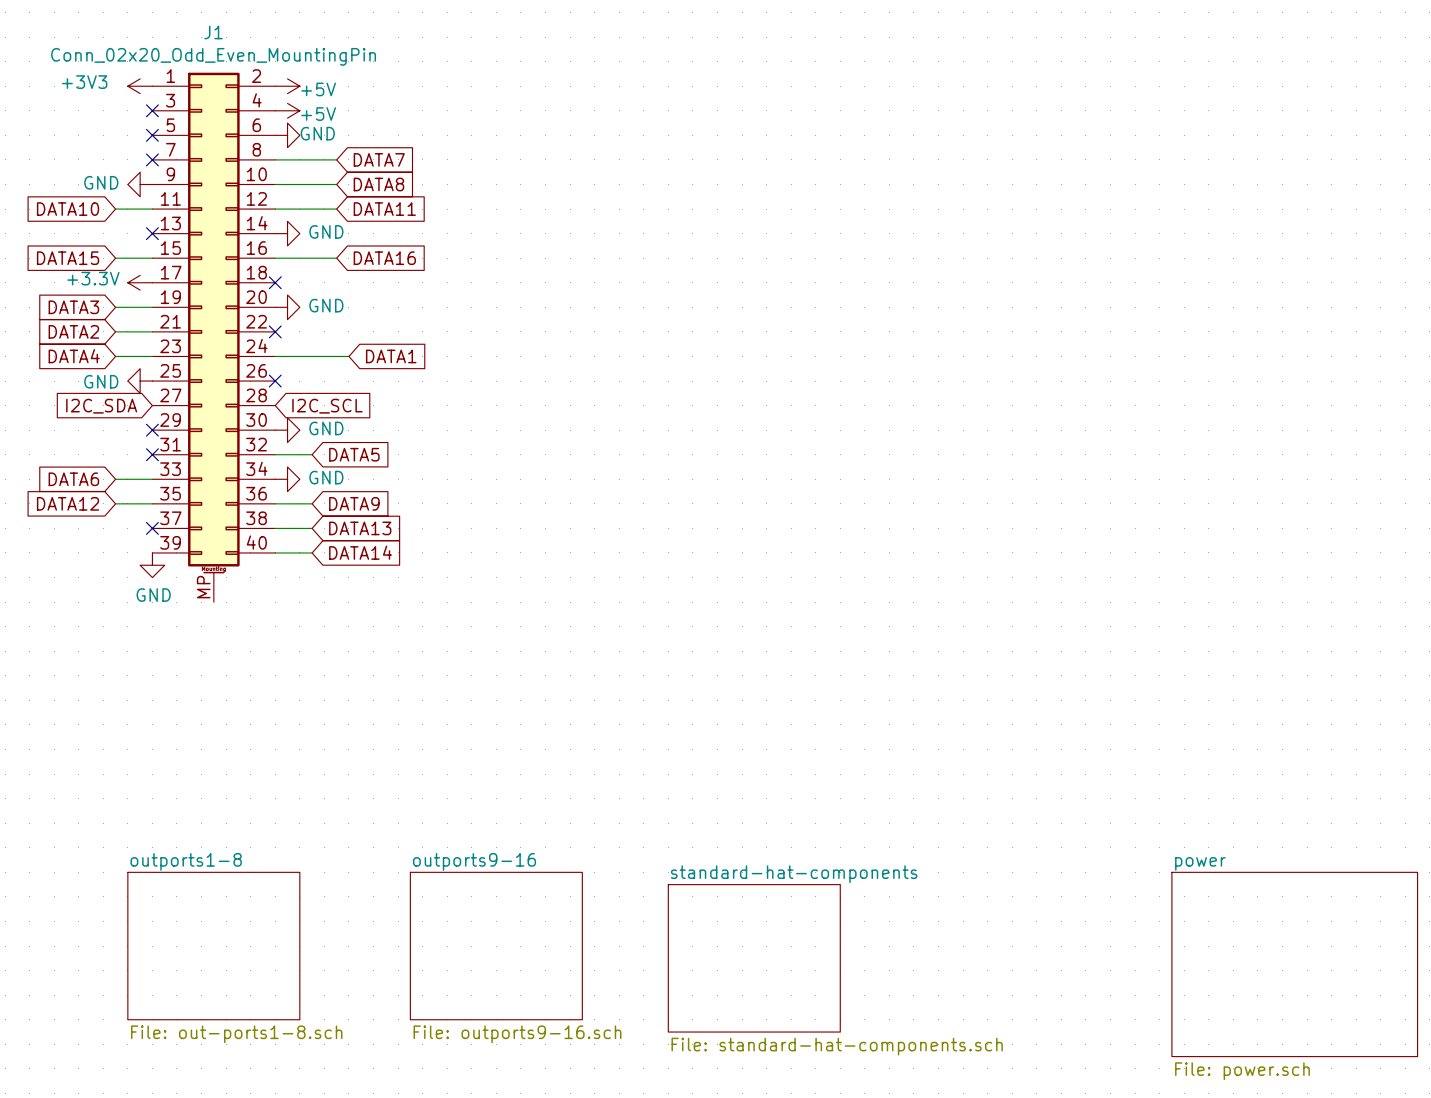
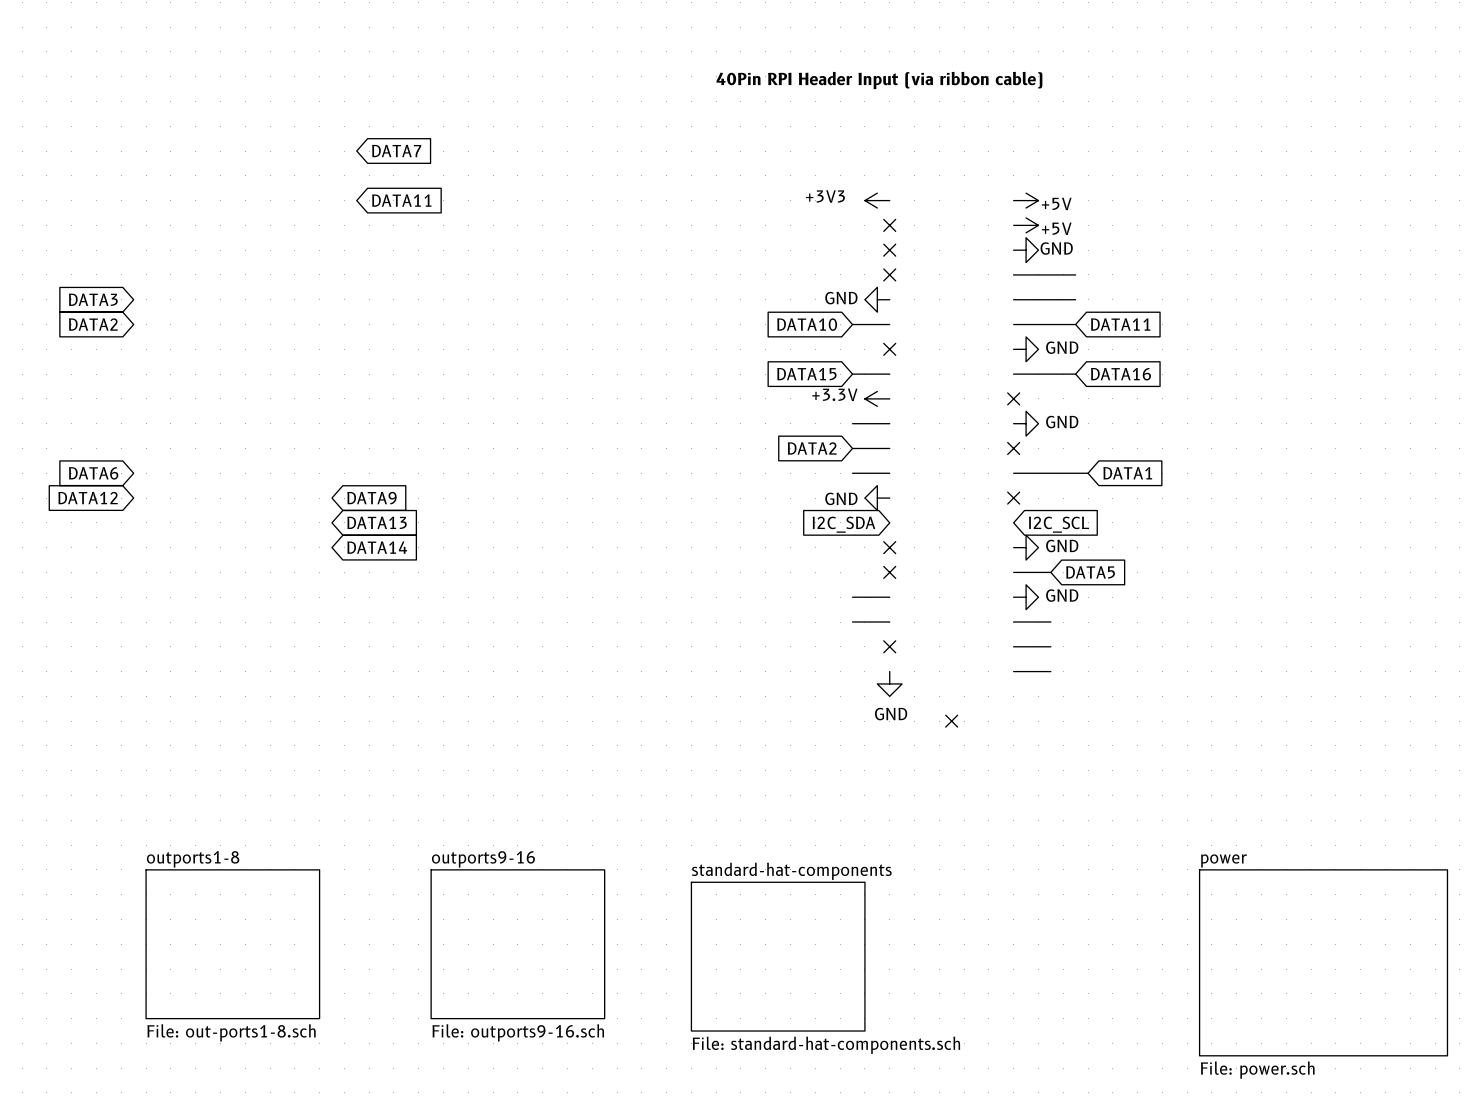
power symbol: +3V3 (140, 86) -> none
power symbol: +5V (287, 86) -> none
text: none -> 40Pin RPI Header Input (via ribbon cable) (879, 80)
no-connect mark: (152, 110) -> none
power symbol: +5V (287, 110) -> none
no-connect mark: (152, 135) -> none
power symbol: GND (287, 135) -> none
no-connect mark: (152, 159) -> none
wire: (275, 159) (336, 159) -> none
power symbol: GND (140, 184) -> none
wire: (275, 184) (336, 184) -> none
global label: DATA8 (378, 184) -> none
global label: DATA10 (68, 209) -> none
wire: (115, 209) (152, 209) -> none
wire: (275, 209) (336, 209) -> none
power symbol: none -> +3V3 (877, 200)
power symbol: none -> +5V (1026, 200)
no-connect mark: (152, 233) -> none
power symbol: GND (287, 233) -> none
no-connect mark: none -> (889, 225)
power symbol: none -> +5V (1026, 225)
global label: DATA15 (68, 258) -> none
wire: (115, 258) (152, 258) -> none
wire: (275, 258) (336, 258) -> none
global label: DATA16 (384, 258) -> none
no-connect mark: none -> (889, 250)
power symbol: none -> GND (1026, 250)
power symbol: +3.3V (140, 282) -> none
no-connect mark: (275, 282) -> none
no-connect mark: none -> (889, 274)
wire: none -> (1013, 274) (1075, 274)
wire: (115, 307) (152, 307) -> none
power symbol: GND (287, 307) -> none
power symbol: none -> GND (877, 299)
wire: none -> (1013, 299) (1075, 299)
wire: (115, 331) (152, 331) -> none
no-connect mark: (275, 331) -> none
global label: none -> DATA10 (807, 324)
wire: none -> (852, 324) (889, 324)
wire: none -> (1013, 324) (1075, 324)
global label: none -> DATA11 (1120, 324)
J1: Conn_02x20_Odd_Even_MountingPin (213, 337) -> none
global label: DATA4 (74, 356) -> none
wire: (115, 356) (152, 356) -> none
wire: (275, 356) (348, 356) -> none
global label: DATA1 (391, 356) -> none
no-connect mark: none -> (889, 349)
power symbol: none -> GND (1026, 349)
power symbol: GND (140, 381) -> none
no-connect mark: (275, 381) -> none
global label: none -> DATA15 (806, 374)
wire: none -> (852, 374) (889, 374)
wire: none -> (1013, 374) (1075, 374)
global label: none -> DATA16 (1120, 374)
power symbol: none -> +3.3V (877, 398)
no-connect mark: none -> (1013, 398)
global label: I2C_SDA (101, 406) -> none
global label: I2C_SCL (327, 406) -> none
no-connect mark: (152, 430) -> none
power symbol: GND (287, 430) -> none
wire: none -> (852, 423) (889, 423)
power symbol: none -> GND (1026, 423)
no-connect mark: (152, 454) -> none
wire: (275, 454) (312, 454) -> none
global label: DATA5 (354, 454) -> none
global label: none -> DATA2 (812, 448)
wire: none -> (852, 448) (889, 448)
no-connect mark: none -> (1013, 448)
wire: (115, 479) (152, 479) -> none
power symbol: GND (287, 479) -> none
wire: none -> (852, 473) (889, 473)
wire: none -> (1013, 473) (1088, 473)
global label: none -> DATA1 (1127, 473)
wire: (115, 503) (152, 503) -> none
wire: (275, 503) (312, 503) -> none
power symbol: none -> GND (877, 498)
no-connect mark: none -> (1013, 498)
no-connect mark: (152, 528) -> none
wire: (275, 528) (312, 528) -> none
global label: none -> I2C_SDA (843, 524)
global label: none -> I2C_SCL (1059, 524)
wire: (275, 552) (312, 552) -> none
no-connect mark: none -> (889, 547)
power symbol: none -> GND (1026, 547)
power symbol: GND (152, 565) -> none
no-connect mark: none -> (889, 572)
wire: none -> (1013, 572) (1050, 572)
global label: none -> DATA5 (1090, 572)
wire: none -> (852, 597) (889, 597)
power symbol: none -> GND (1026, 597)
wire: none -> (852, 622) (889, 622)
wire: none -> (1013, 622) (1050, 622)
no-connect mark: none -> (889, 646)
wire: none -> (1013, 646) (1050, 646)
wire: none -> (1013, 671) (1050, 671)
power symbol: none -> GND (889, 683)
no-connect mark: none -> (951, 721)

